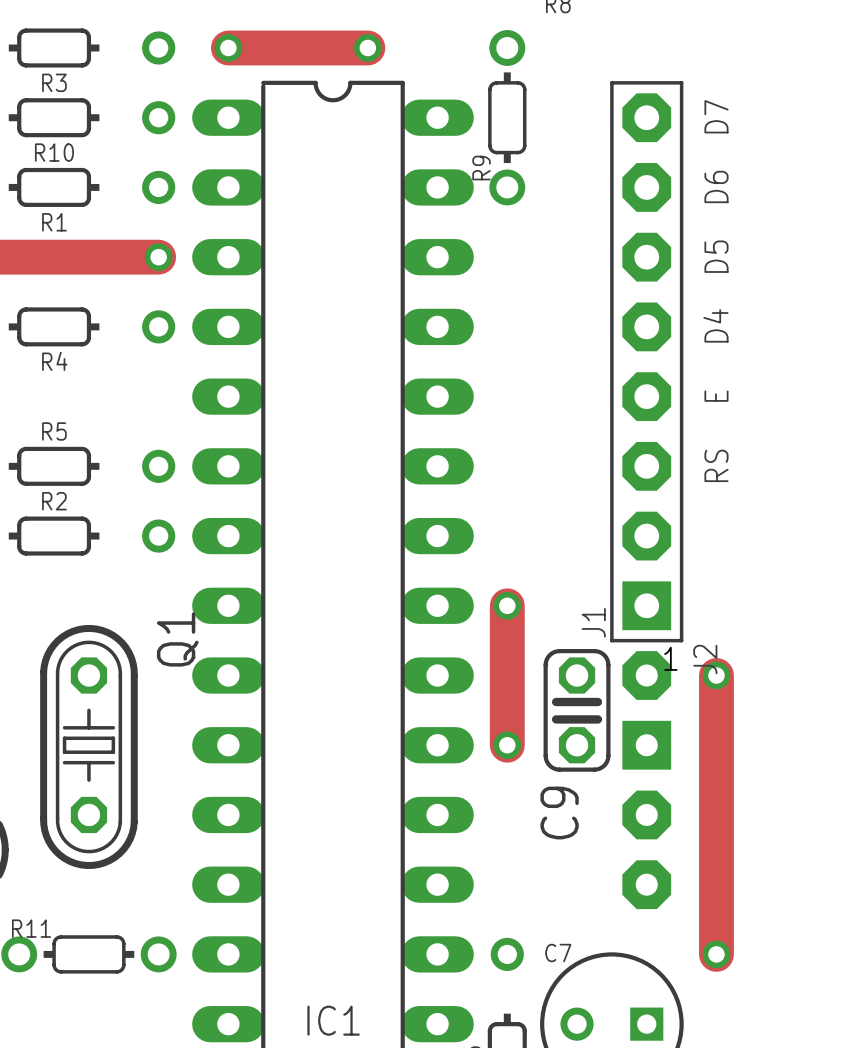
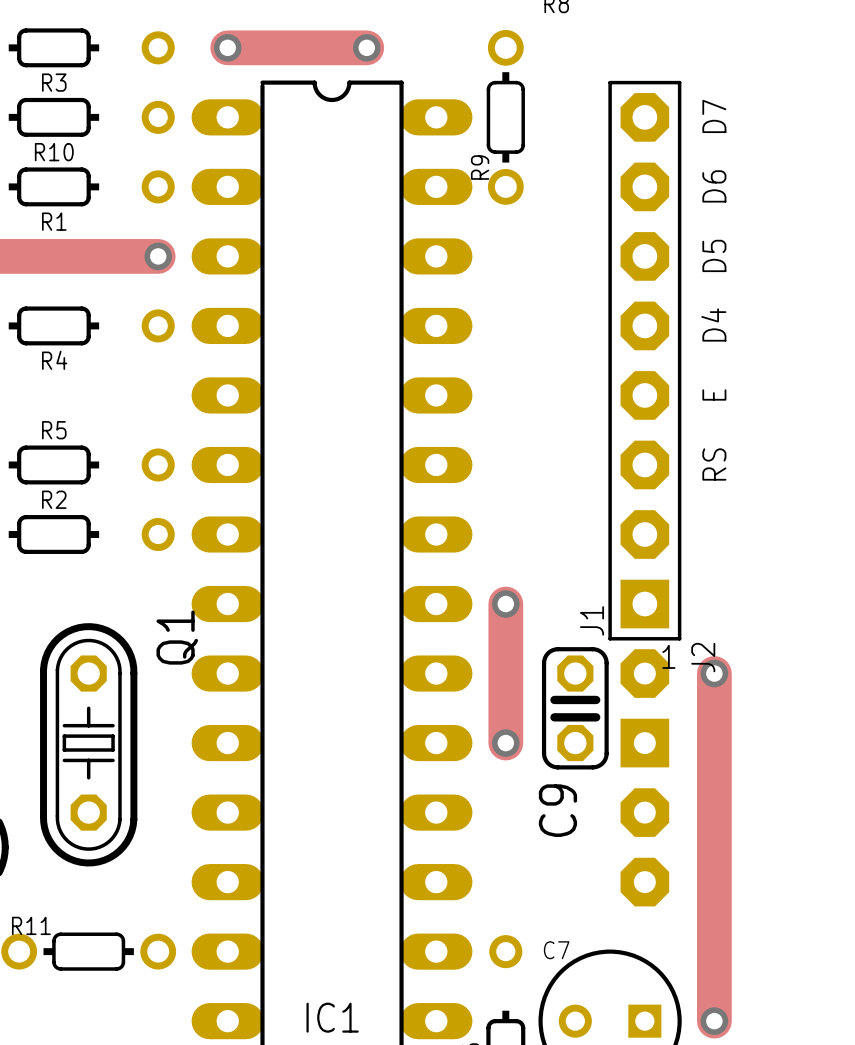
track: none -> (714, 951) (714, 1021)
via position: (716, 954) -> (714, 1021)

